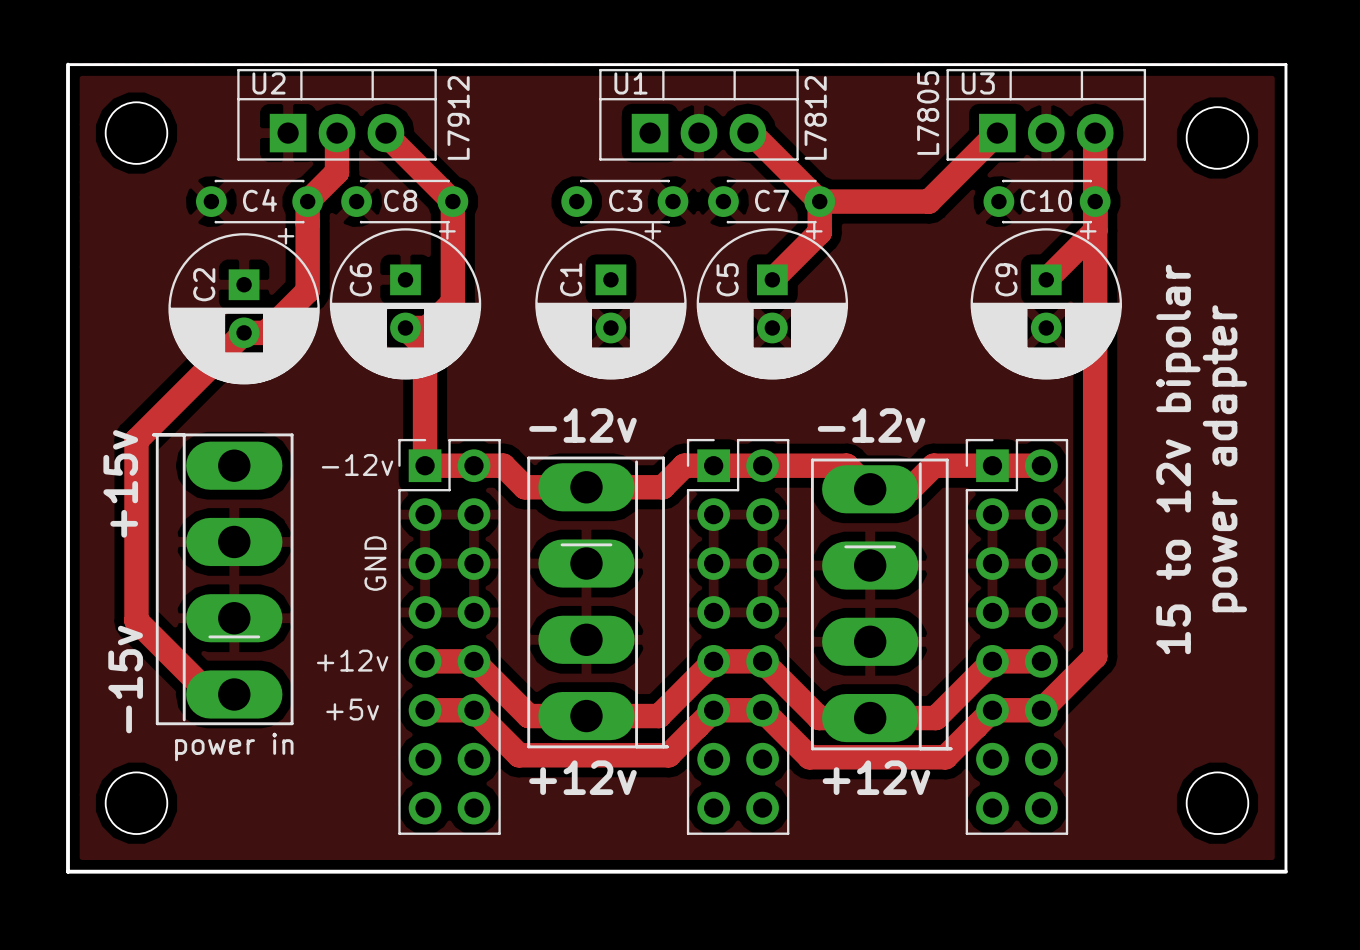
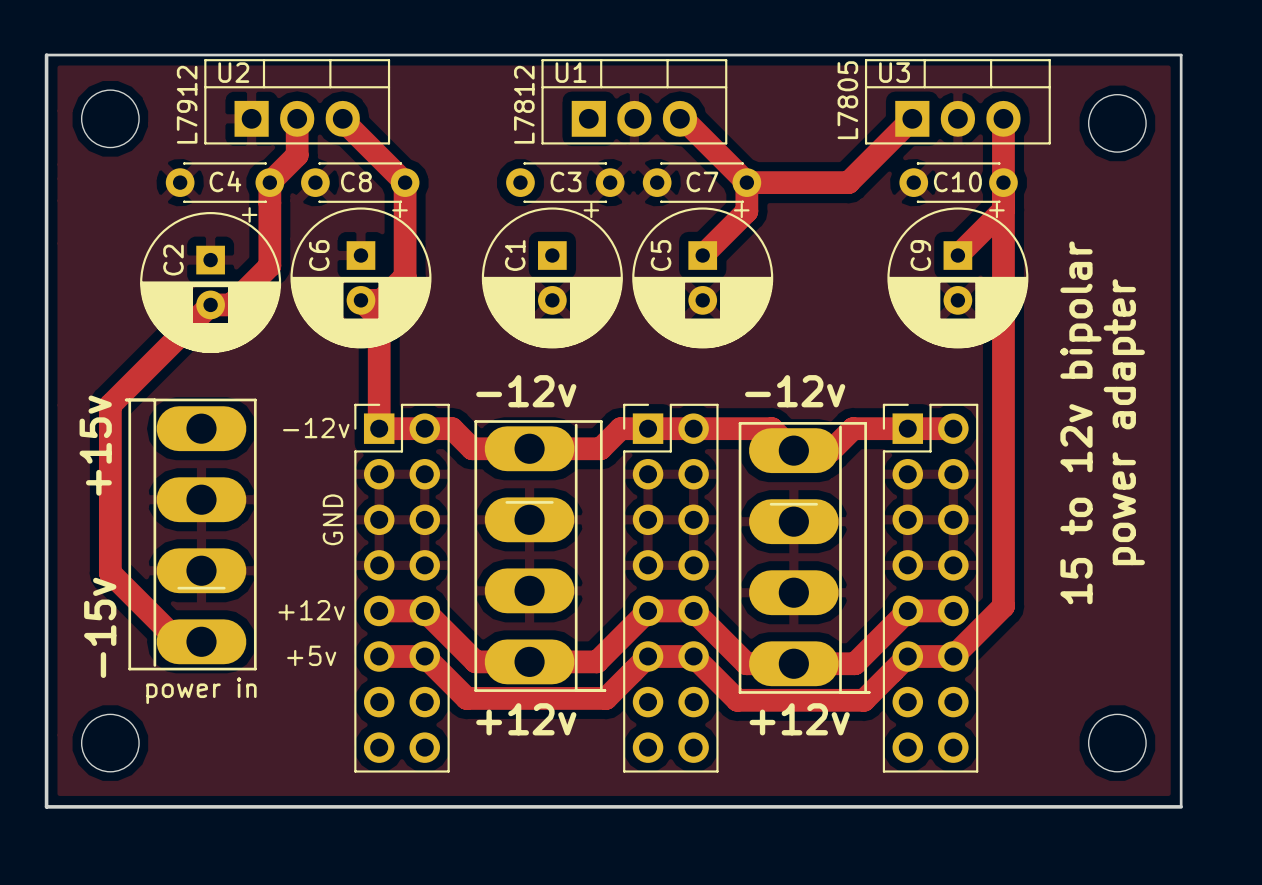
U2 value position: L7912 (458, 117) -> L7912 (187, 104)
U1 value position: L7812 (815, 117) -> L7812 (524, 104)

